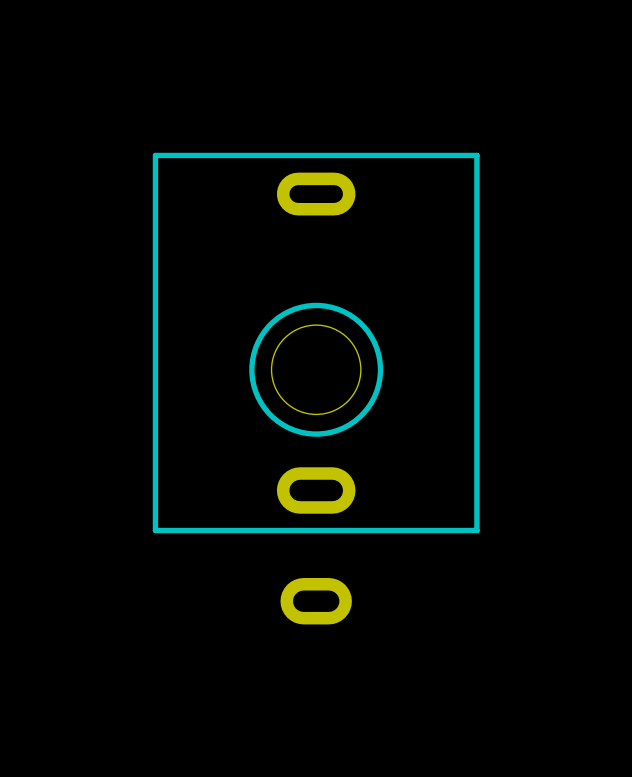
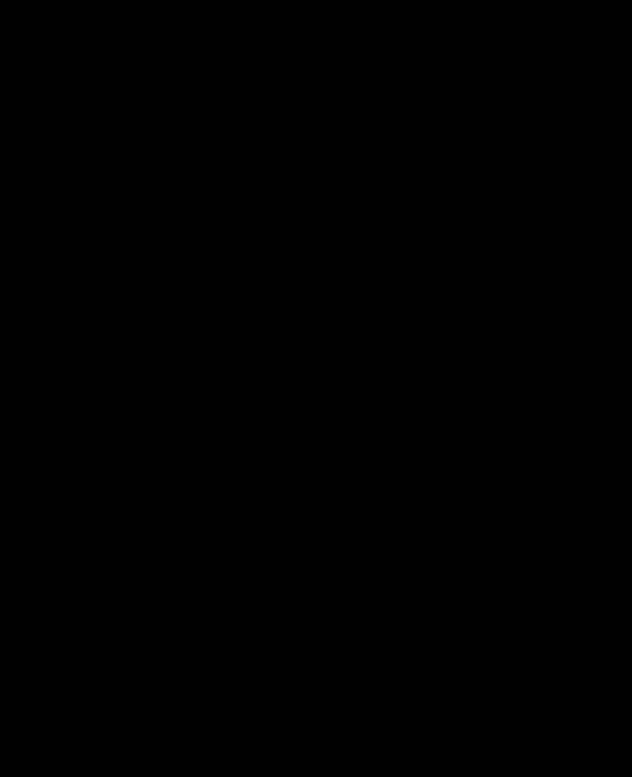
part: (316, 388) -> none

